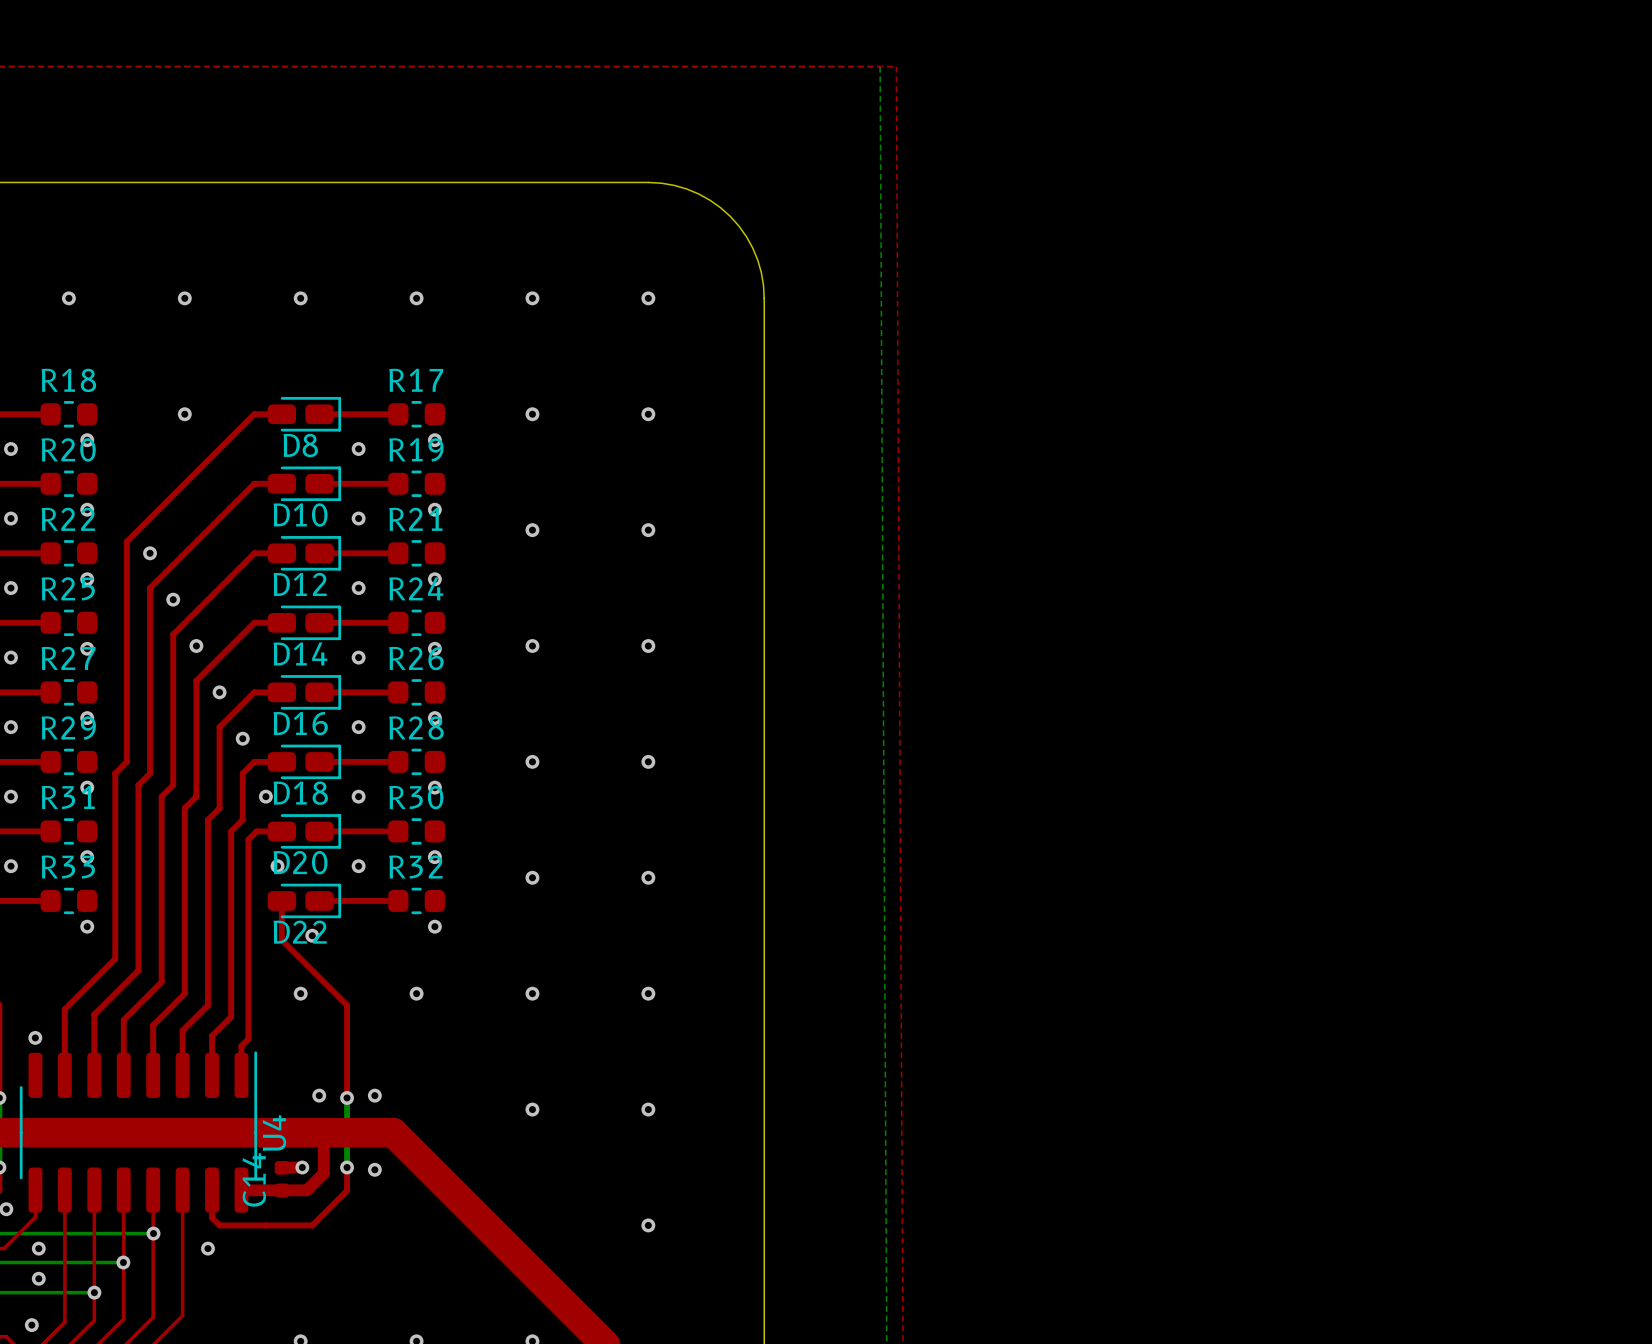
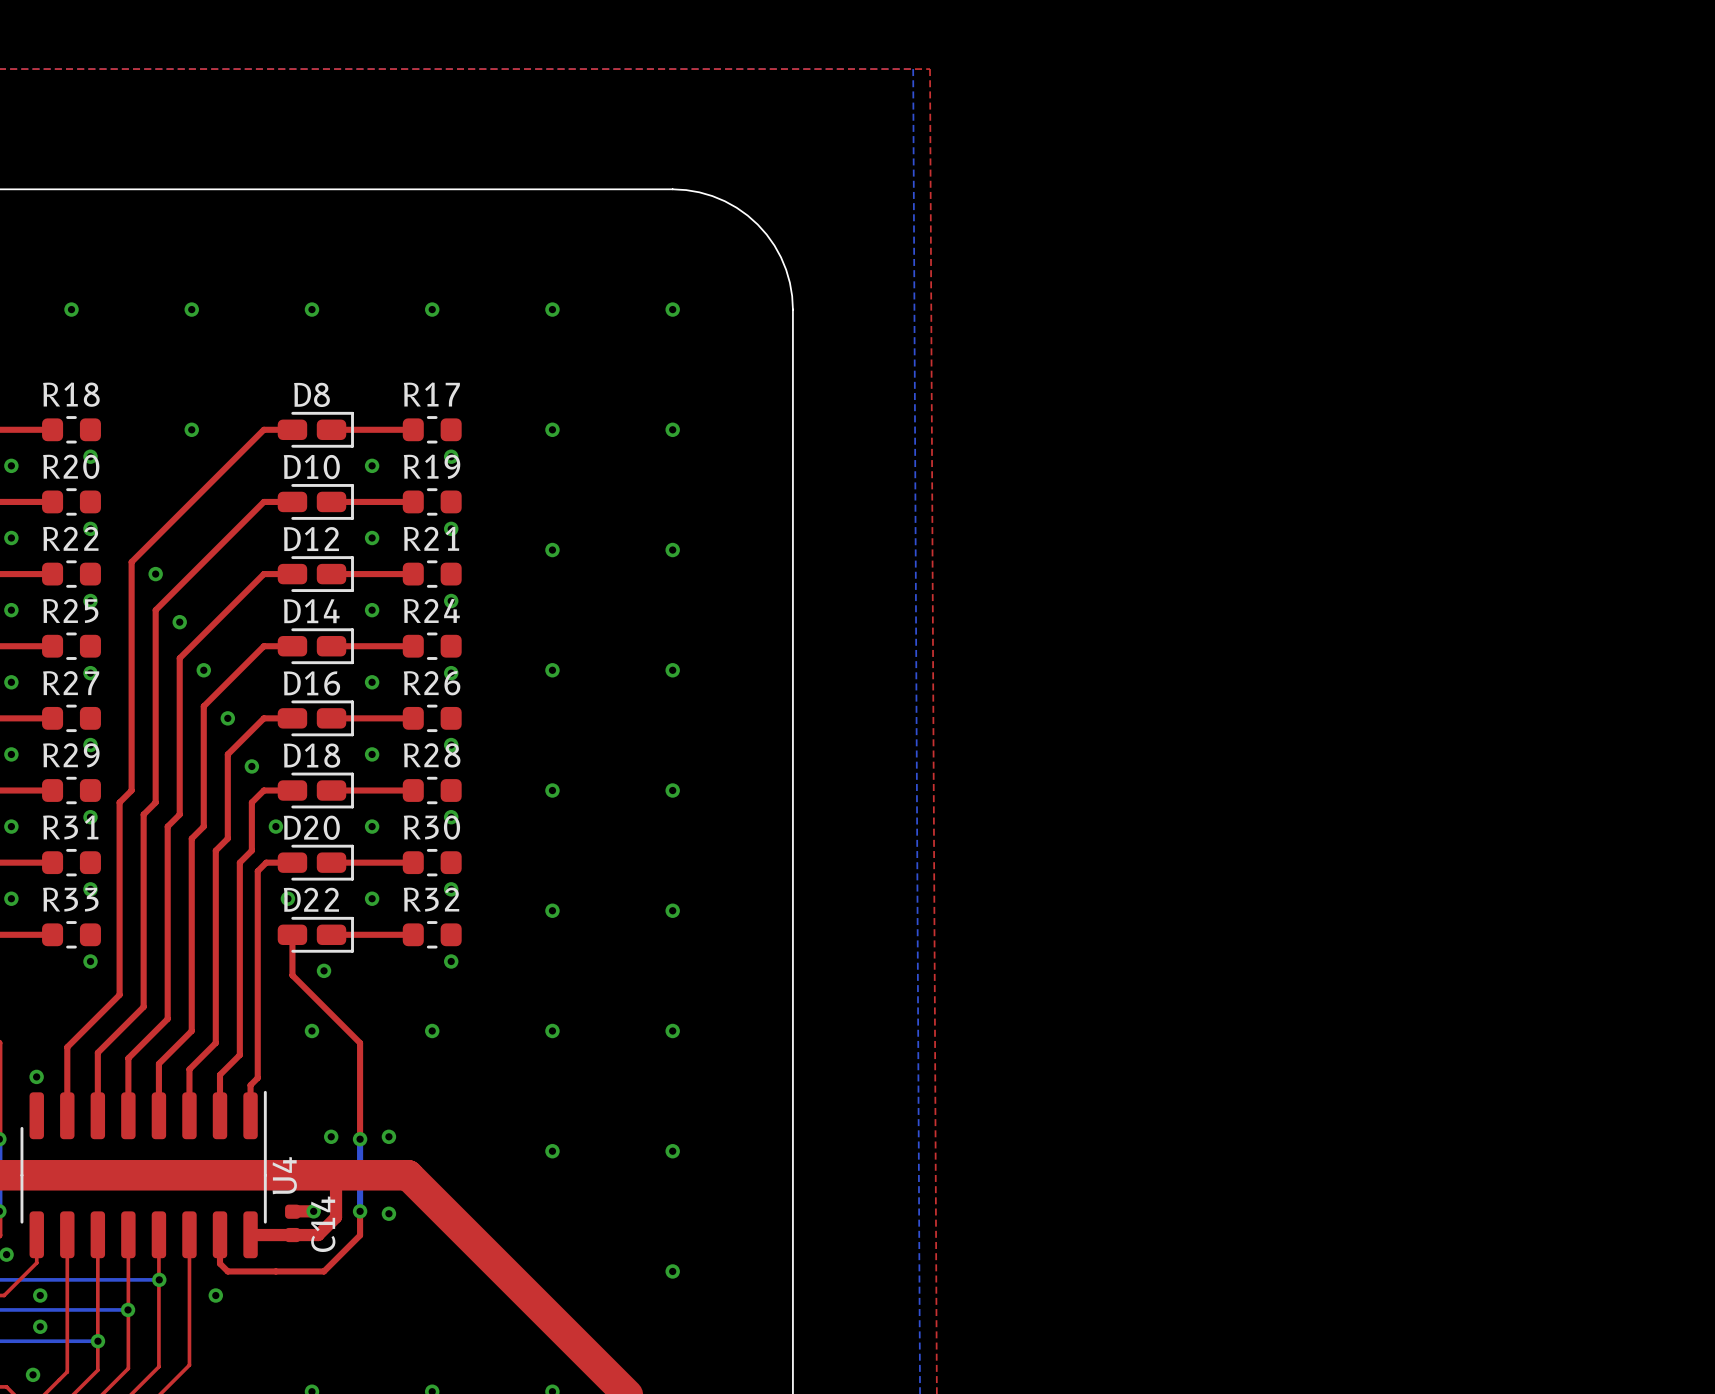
D8 name position: D8 (300, 445) -> D8 (312, 394)
D10 name position: D10 (300, 515) -> D10 (311, 467)
D12 name position: D12 (300, 584) -> D12 (311, 539)
D14 name position: D14 (300, 653) -> D14 (311, 611)
D16 name position: D16 (300, 723) -> D16 (311, 683)
D18 name position: D18 (300, 793) -> D18 (312, 755)
D20 name position: D20 (300, 862) -> D20 (311, 827)
D22 name position: D22 (300, 932) -> D22 (311, 899)
C14 name position: C14 (254, 1179) -> C14 (323, 1224)

